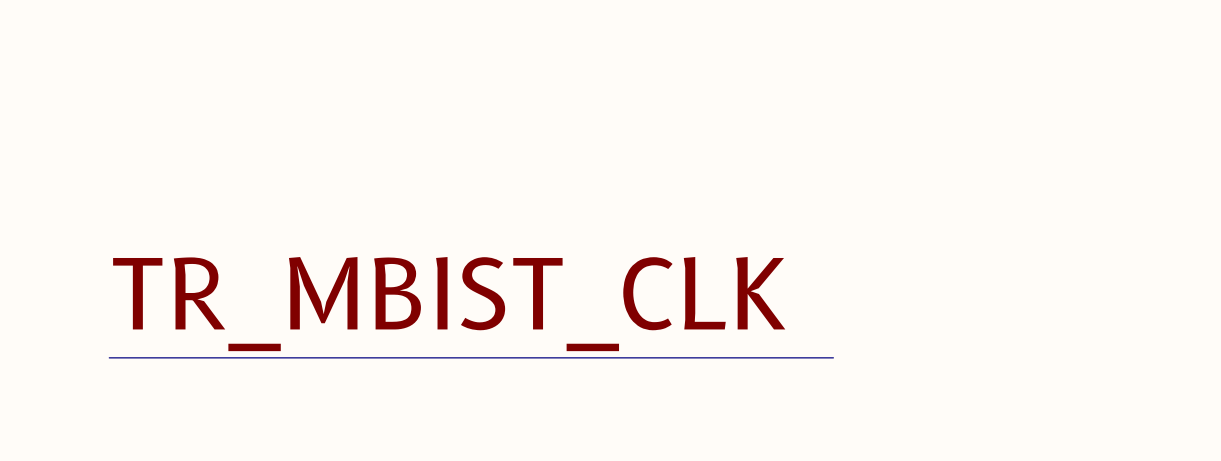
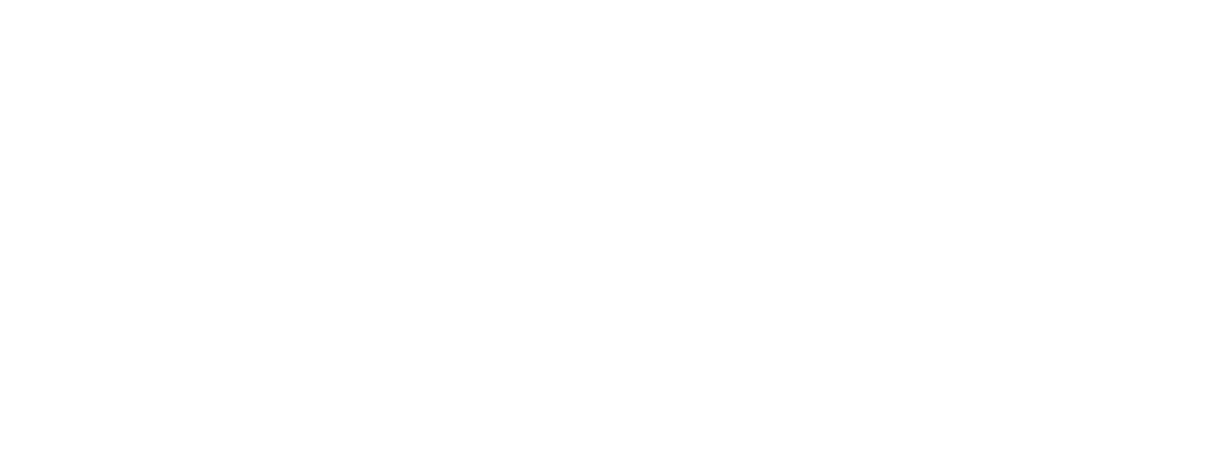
label: TR_MBIST_CLK (449, 304) -> none
wire: (109, 357) (833, 357) -> none

